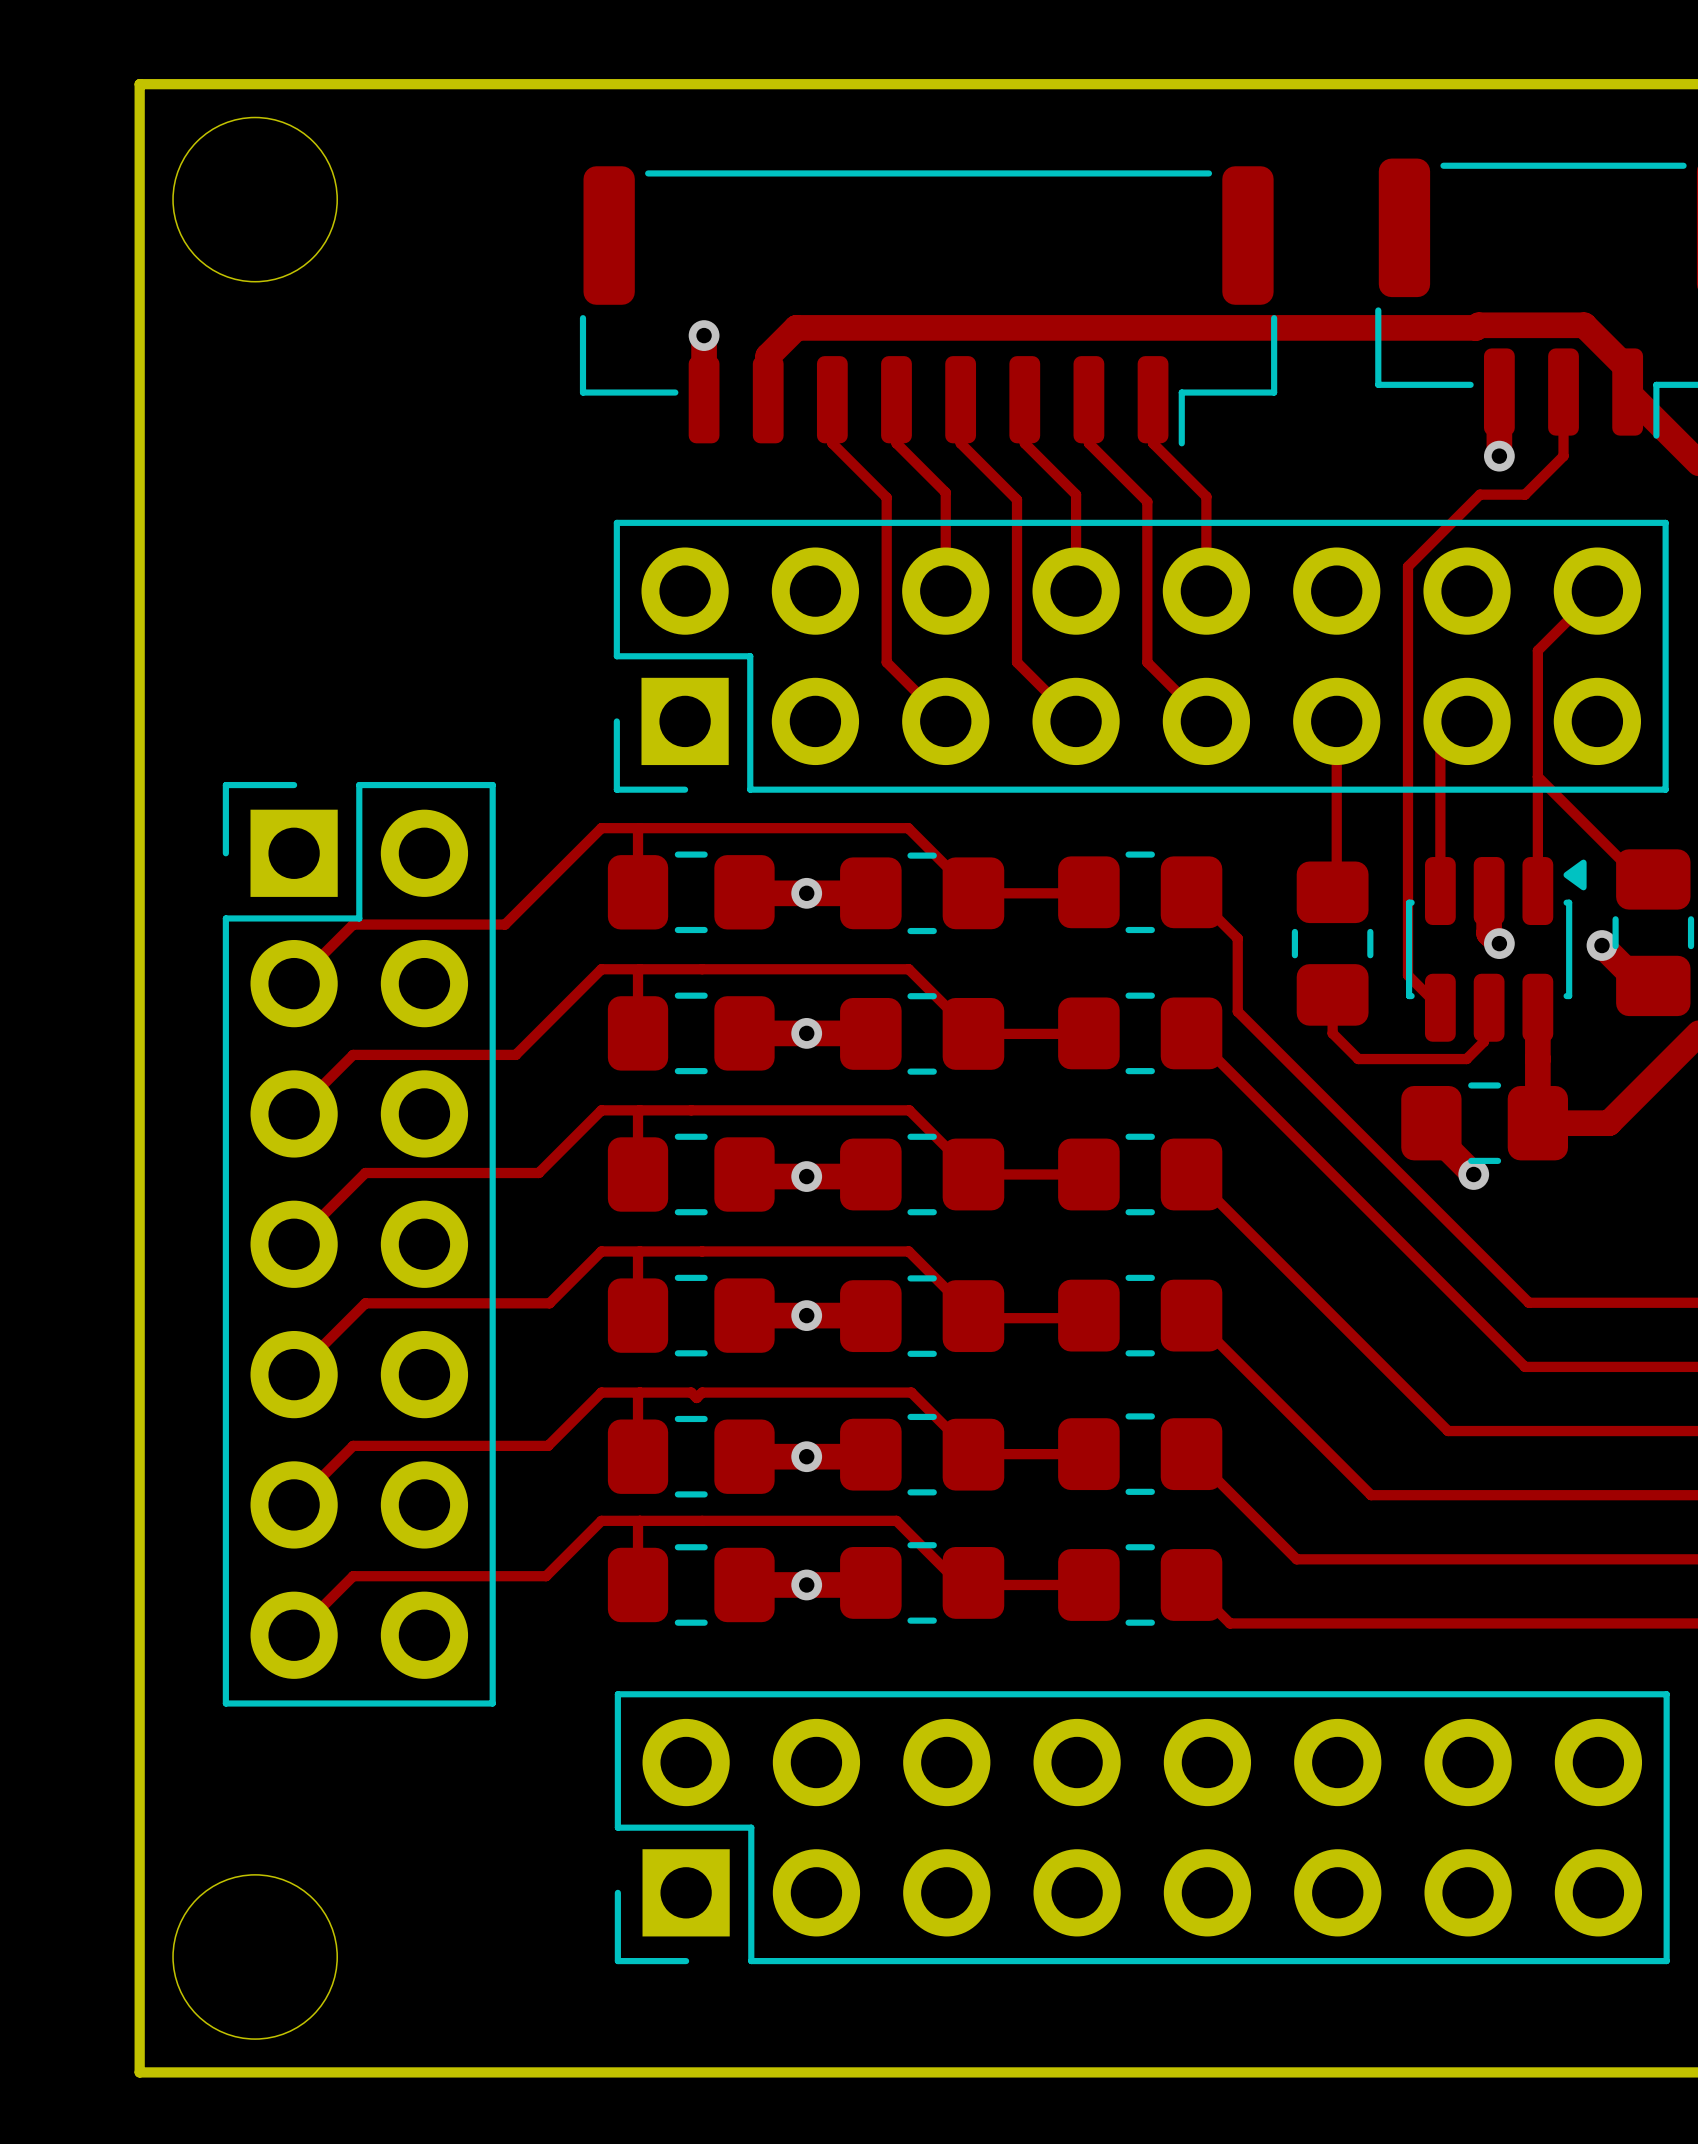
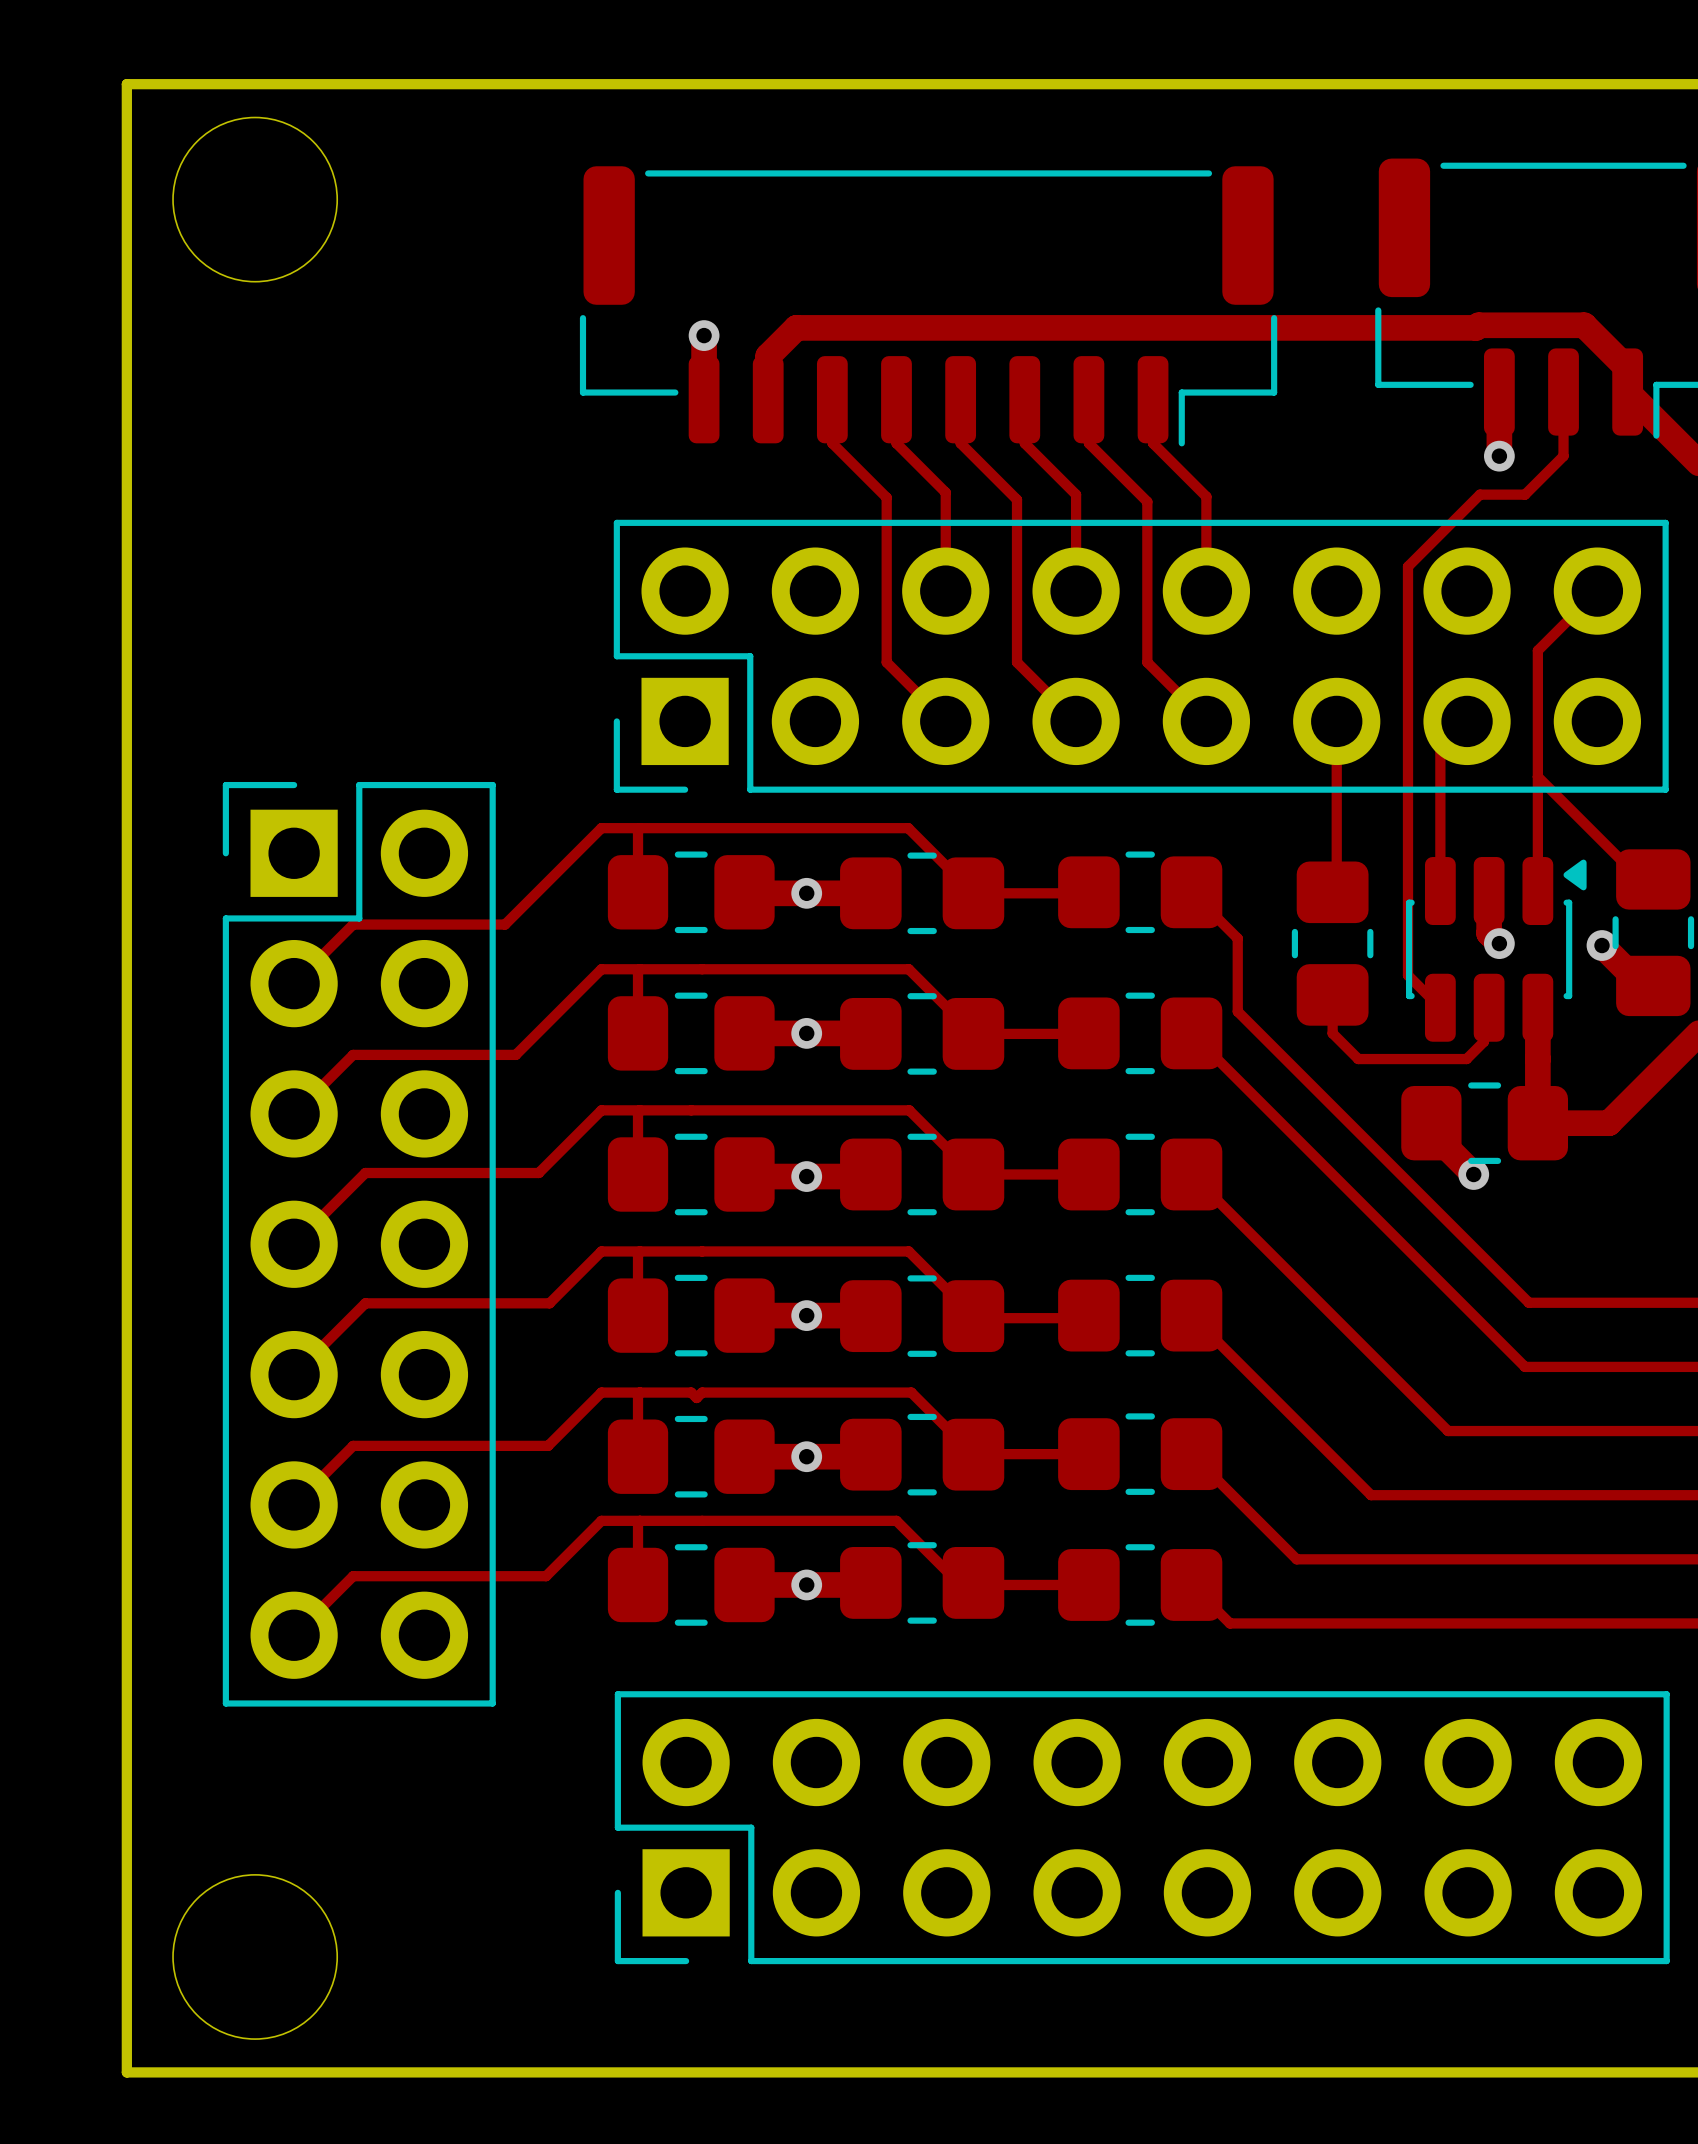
board edge: (139, 84) (139, 2072) -> (139, 84) (126, 84) (126, 2072) (139, 2072)

